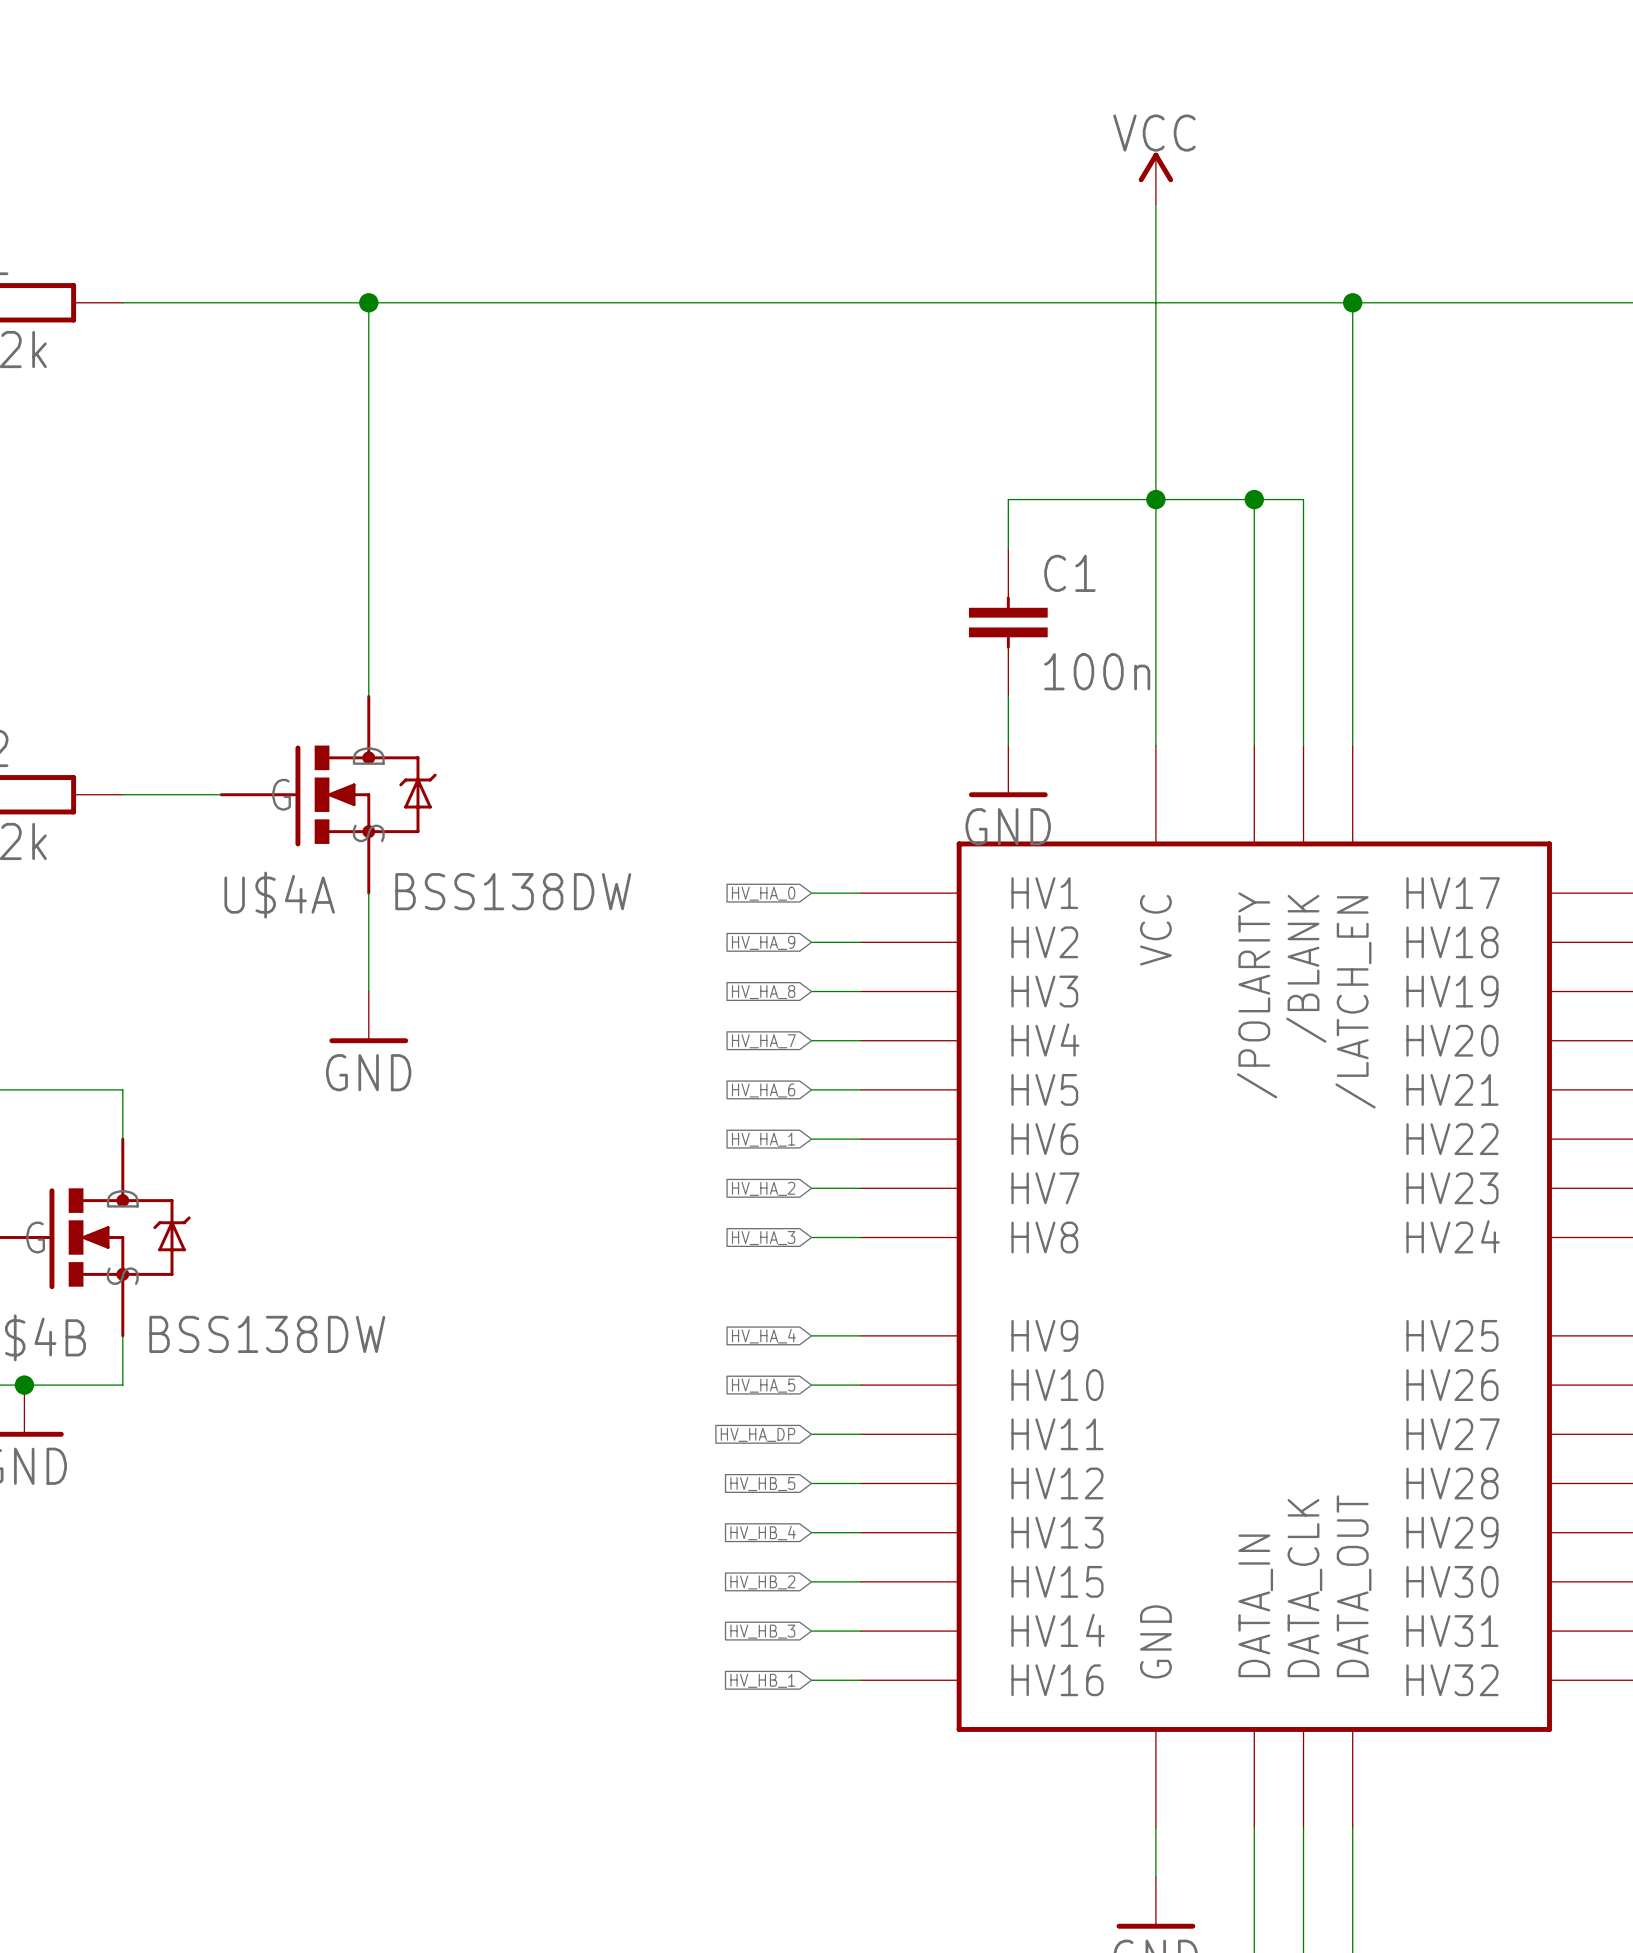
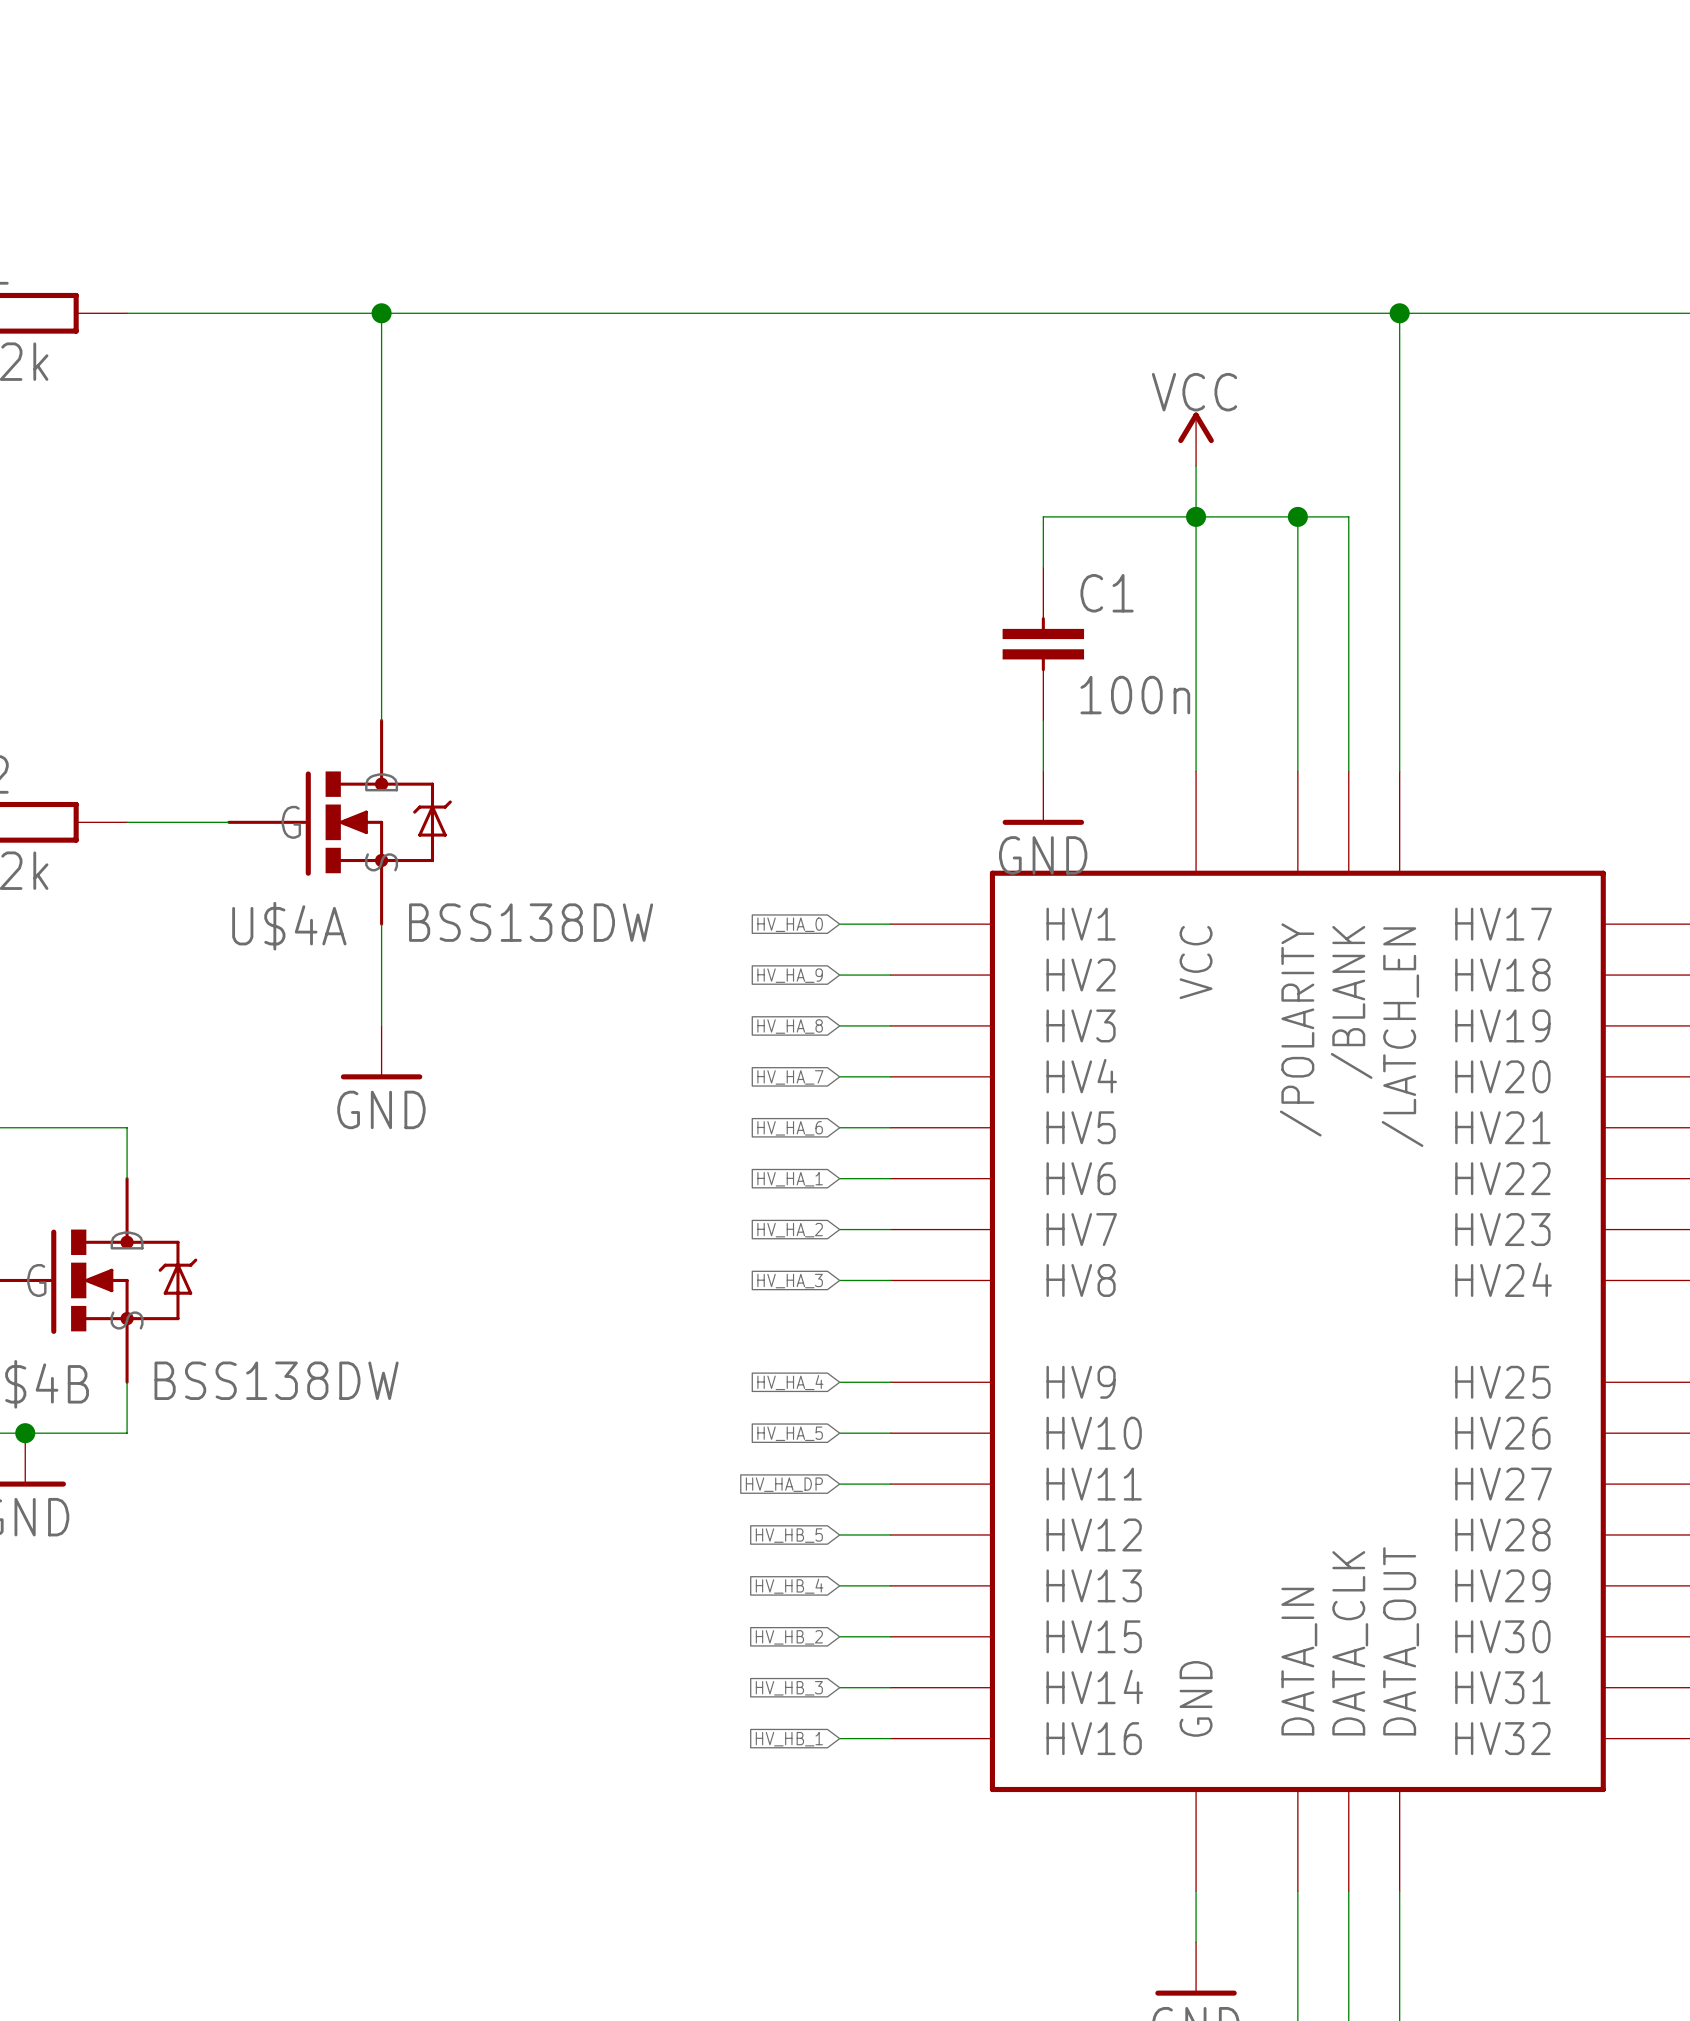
power symbol position: VCC (1155, 178) -> VCC (1196, 439)
wire: (1155, 204) (1155, 450) -> none

